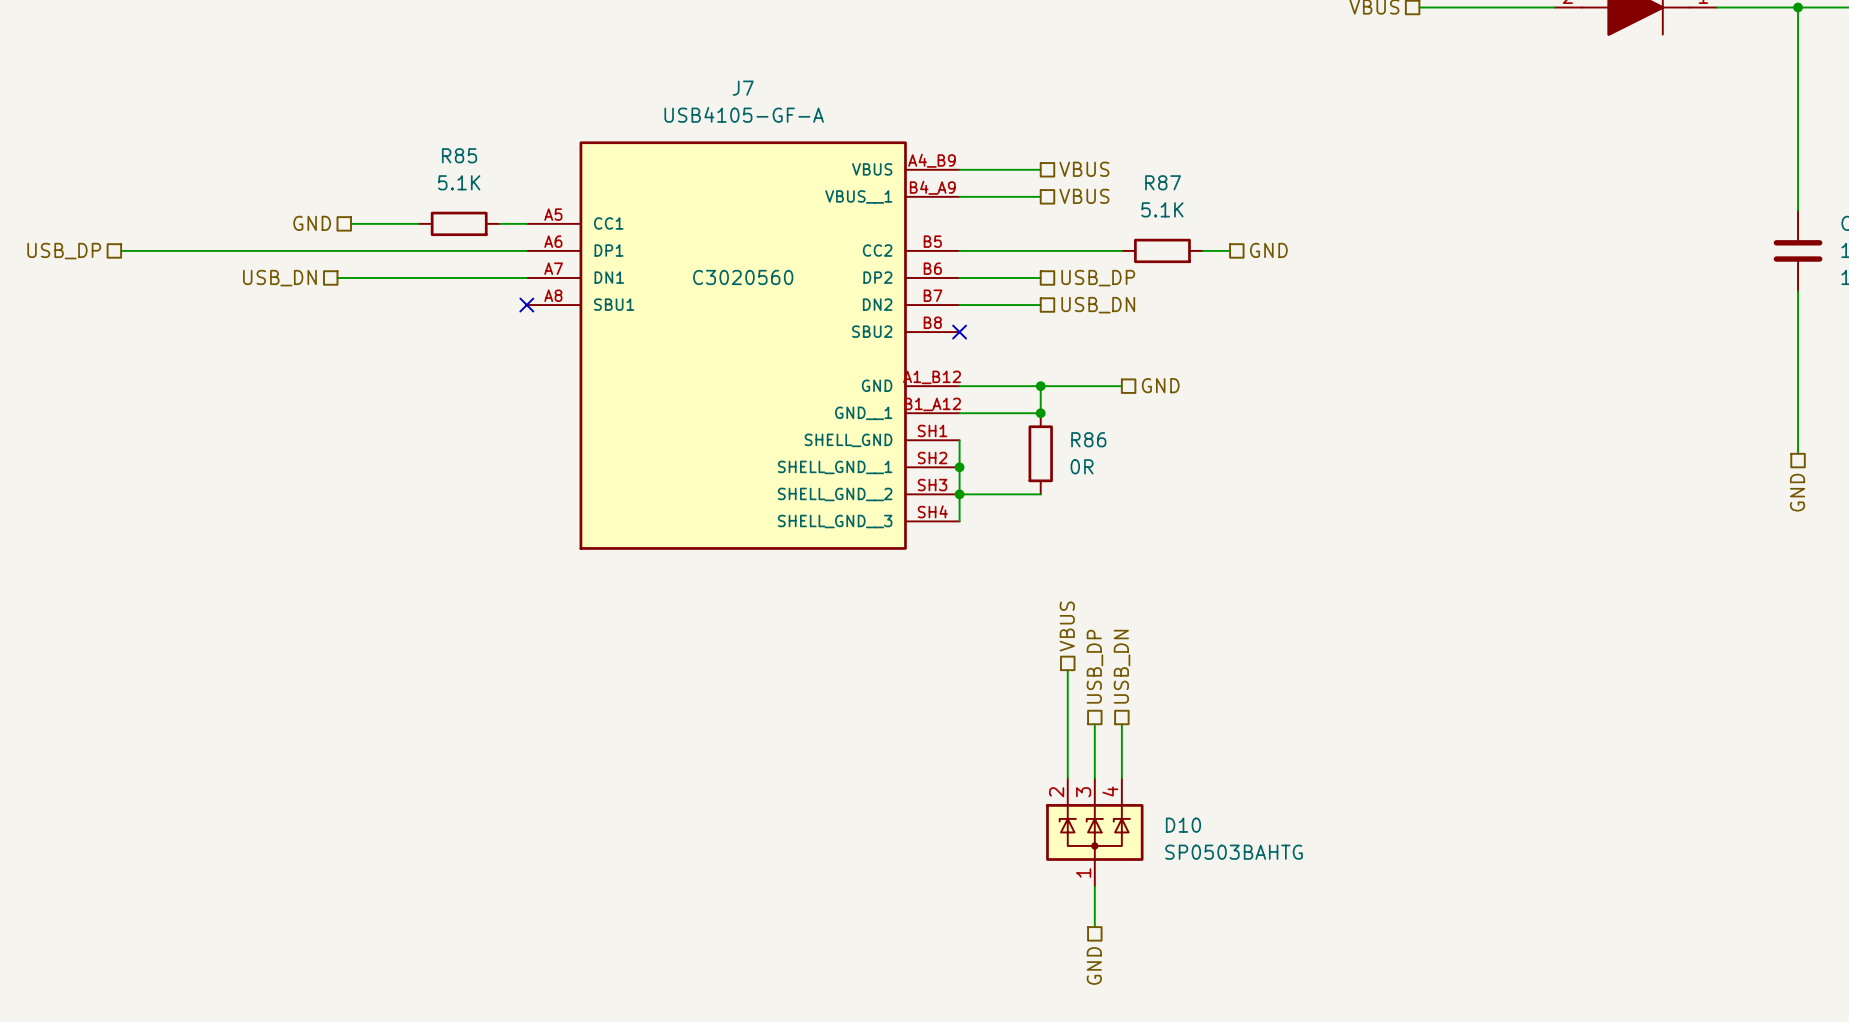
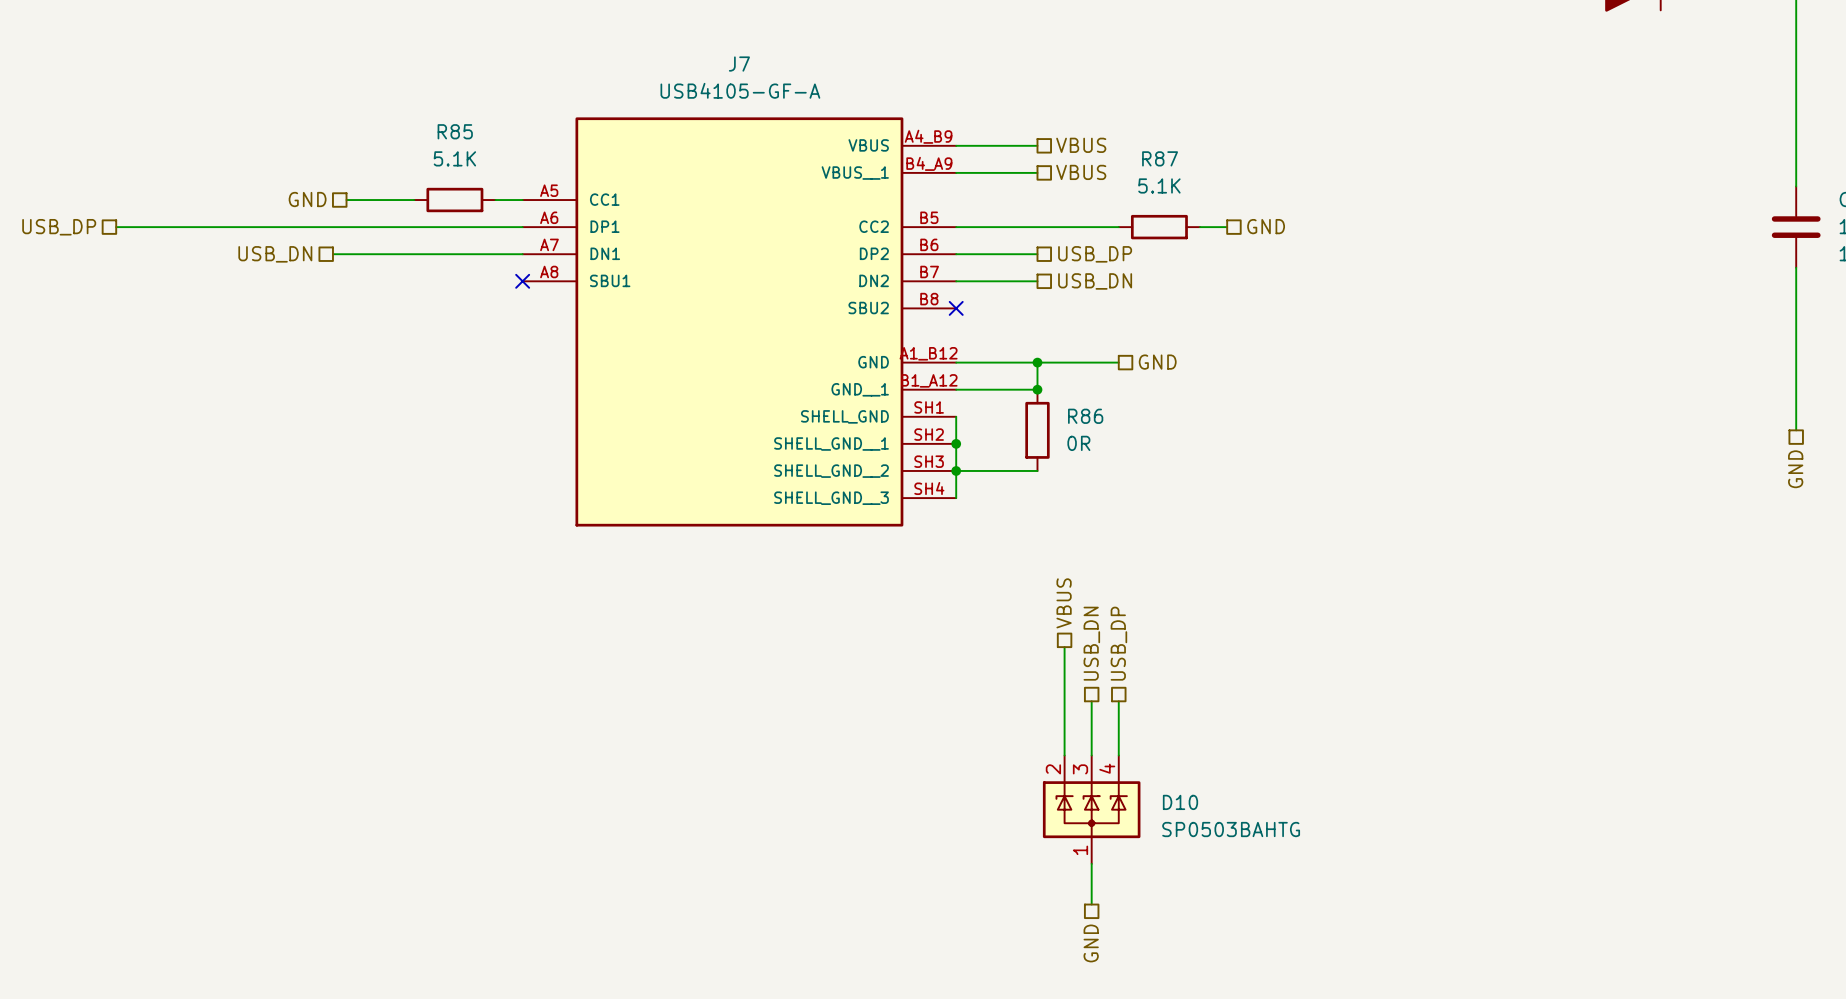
J7 text: C3020560 (743, 277) -> none
hierarchical label: USB_DP (1094, 666) -> USB_DN (1091, 643)
hierarchical label: USB_DN (1122, 666) -> USB_DP (1118, 643)

